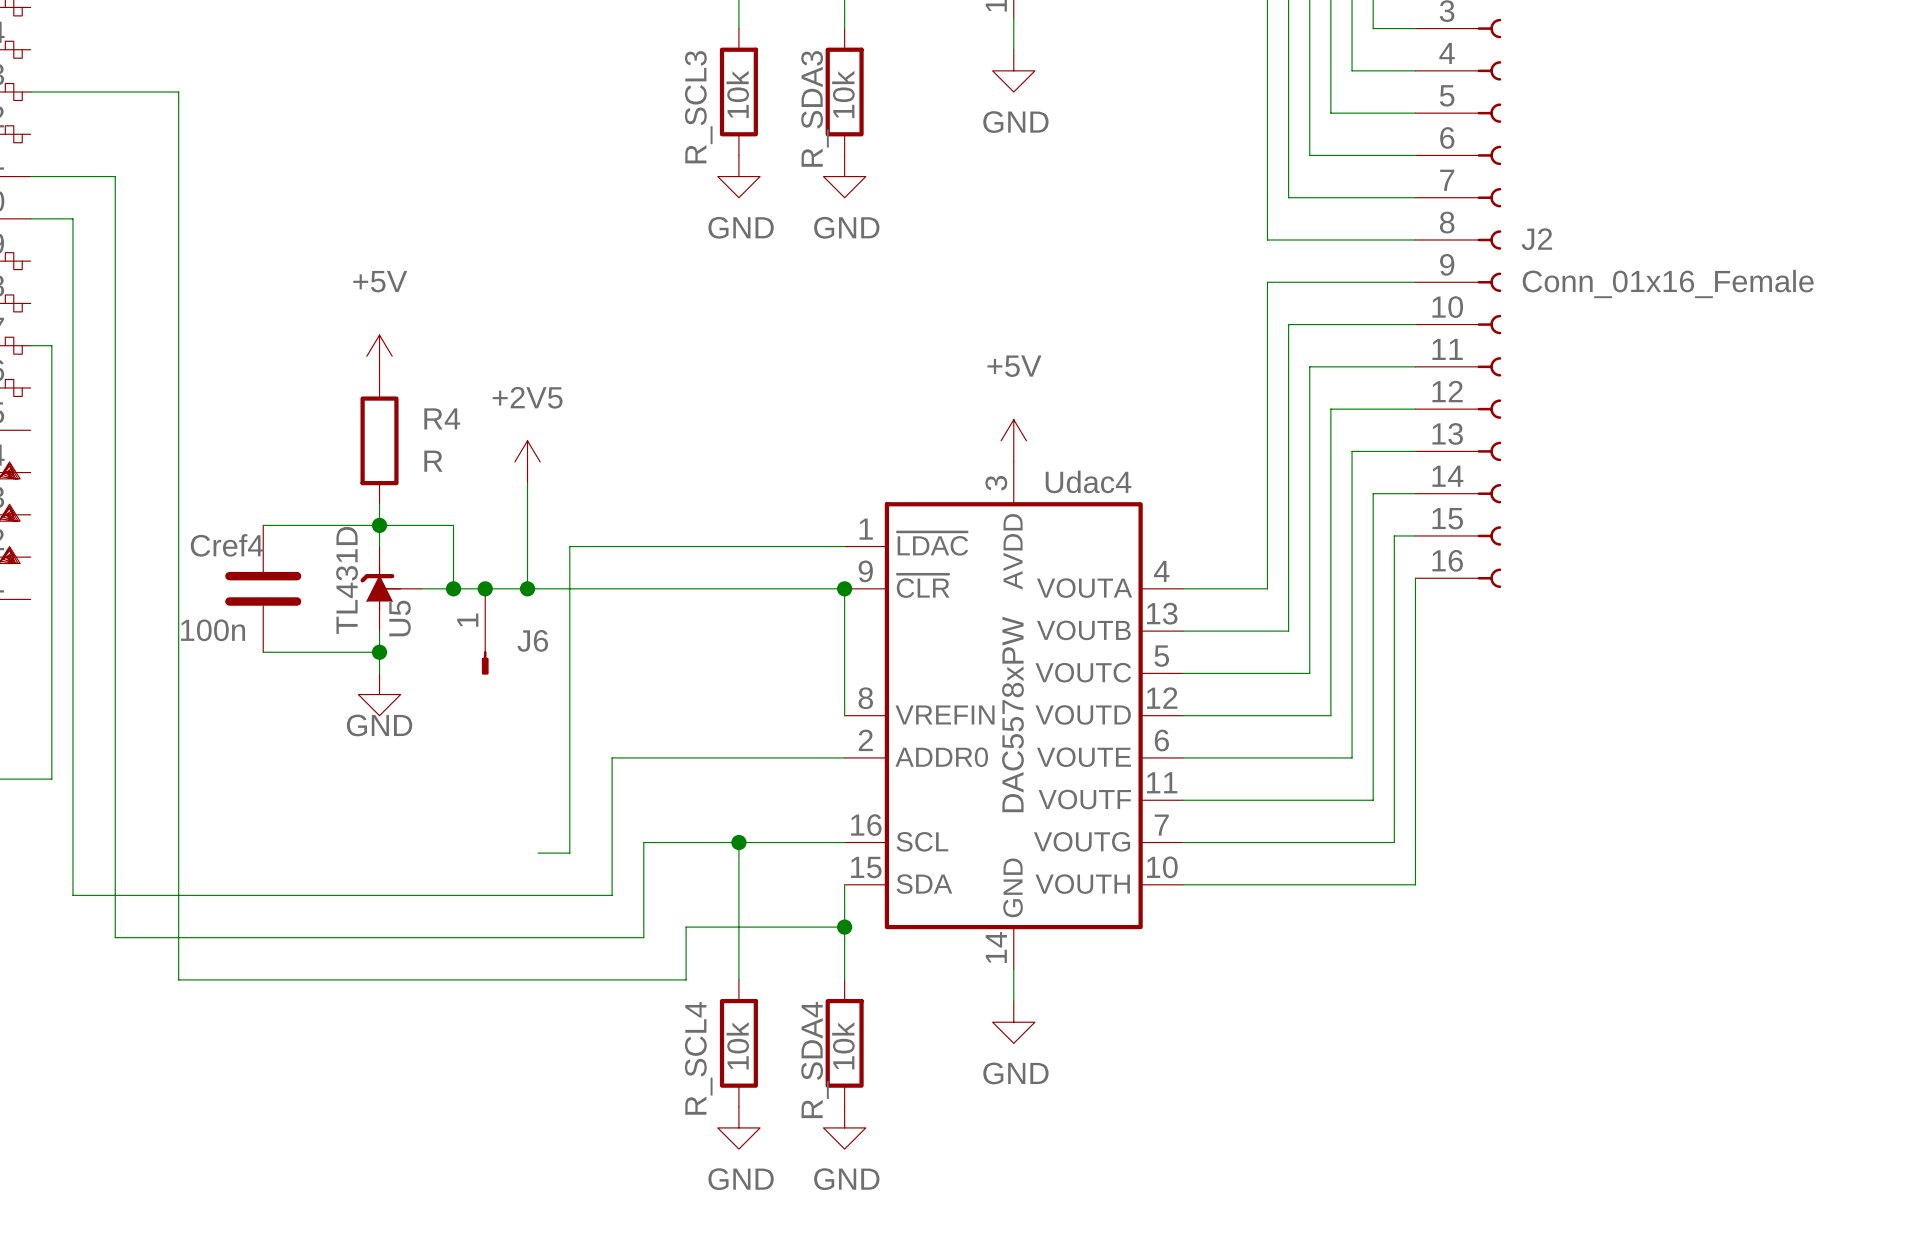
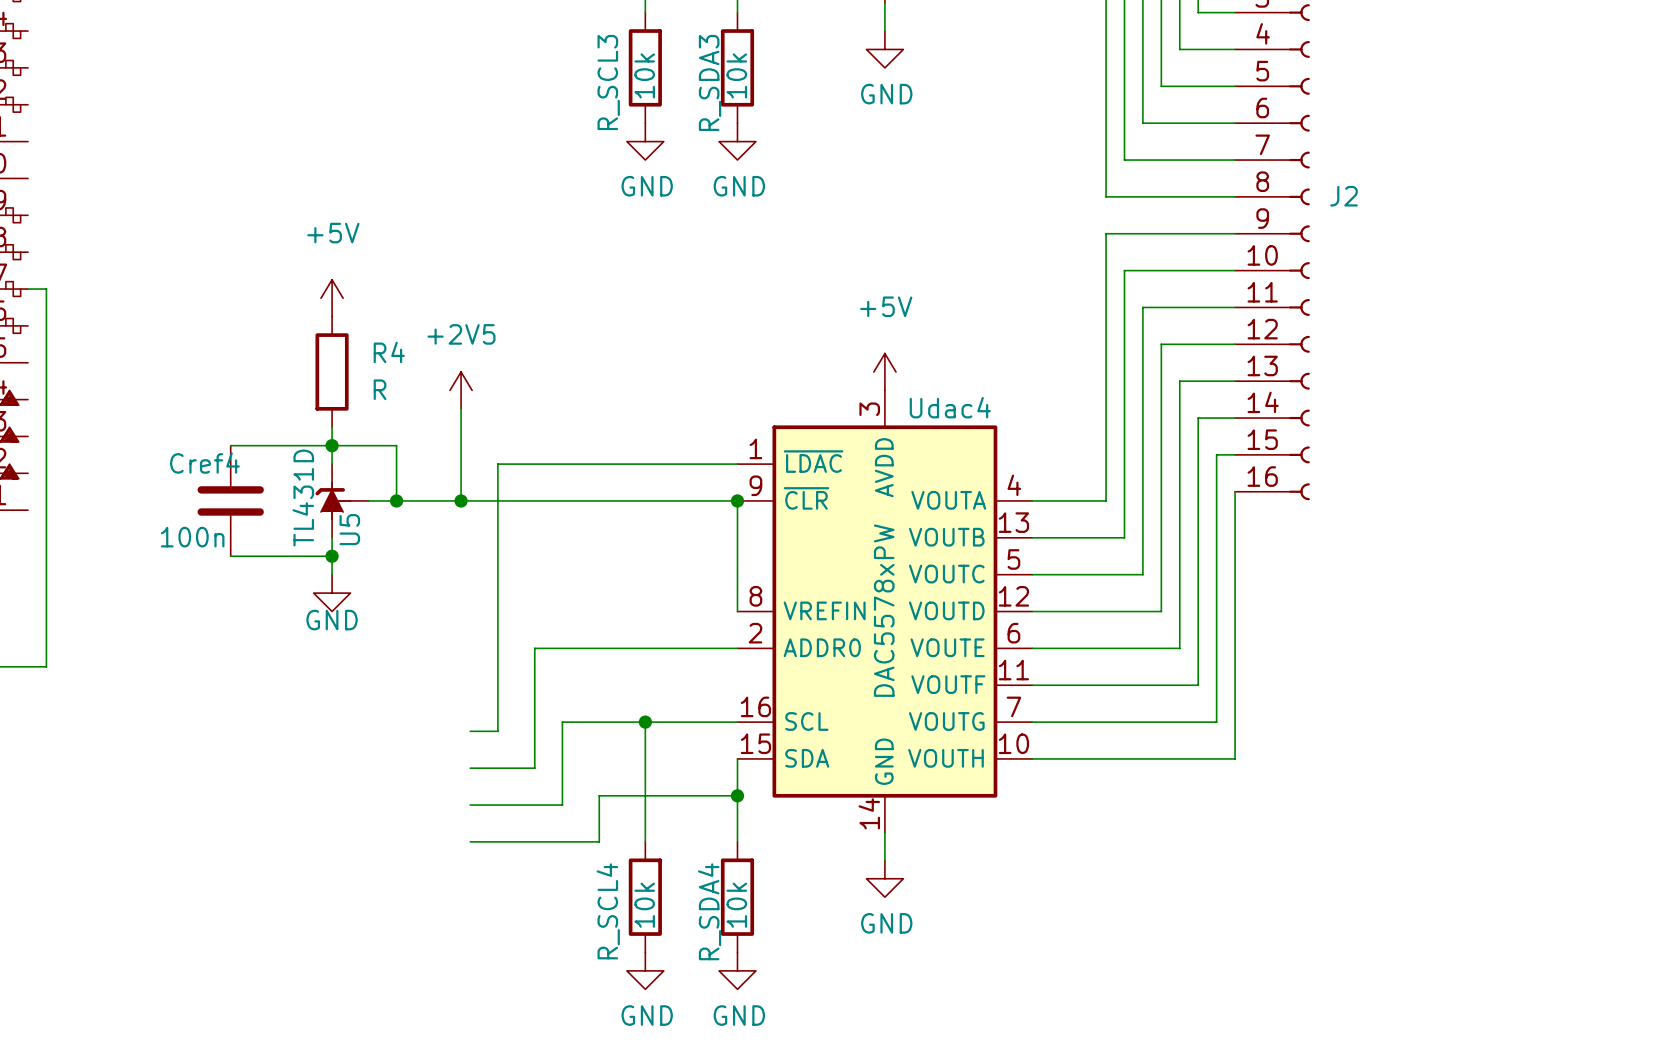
wire: (30, 92) (178, 92) (178, 979) (538, 979) -> none
wire: (30, 176) (115, 176) (115, 937) (538, 937) -> none
wire: (30, 218) (72, 218) (72, 895) (538, 895) -> none
J2 value: Conn_01x16_Female (1668, 283) -> none
junction: (485, 588) -> none
J6: (485, 631) -> none

